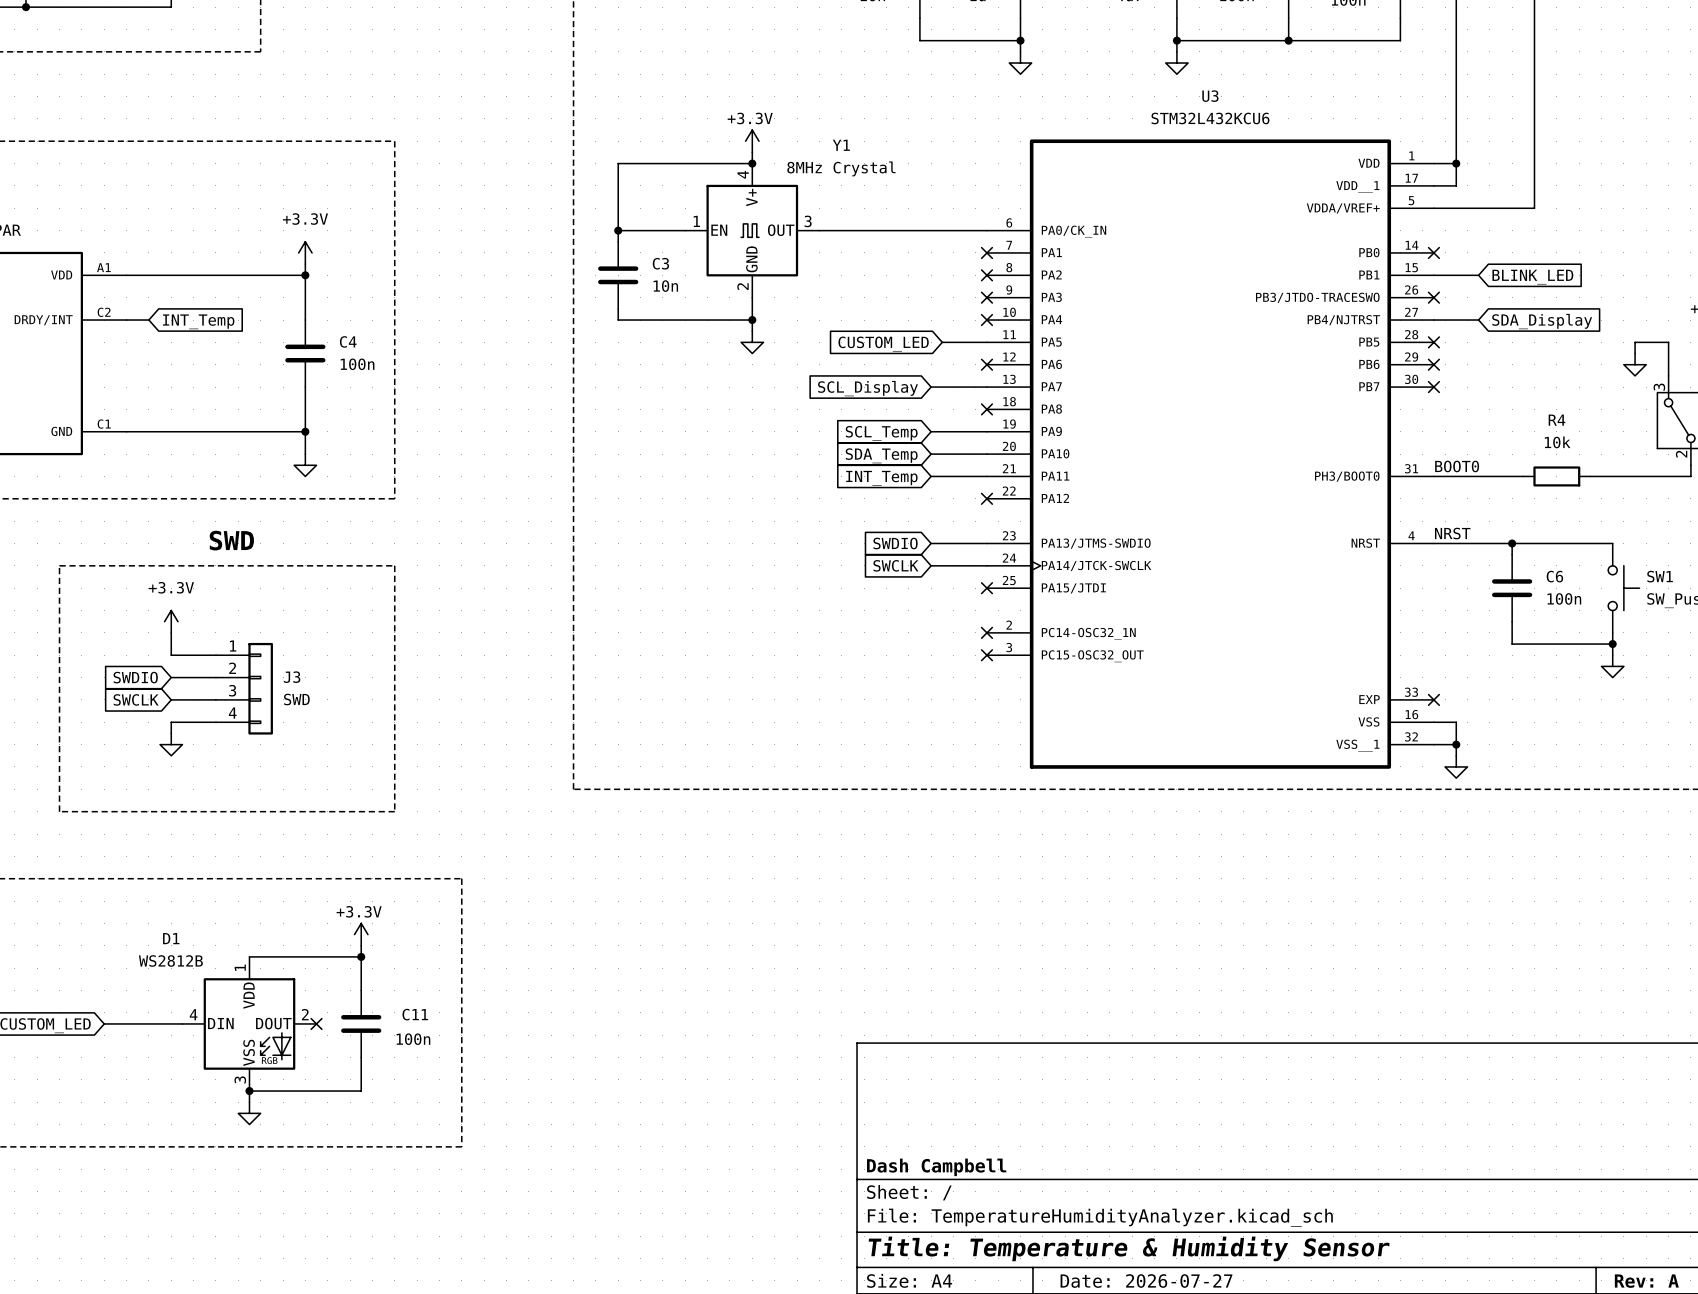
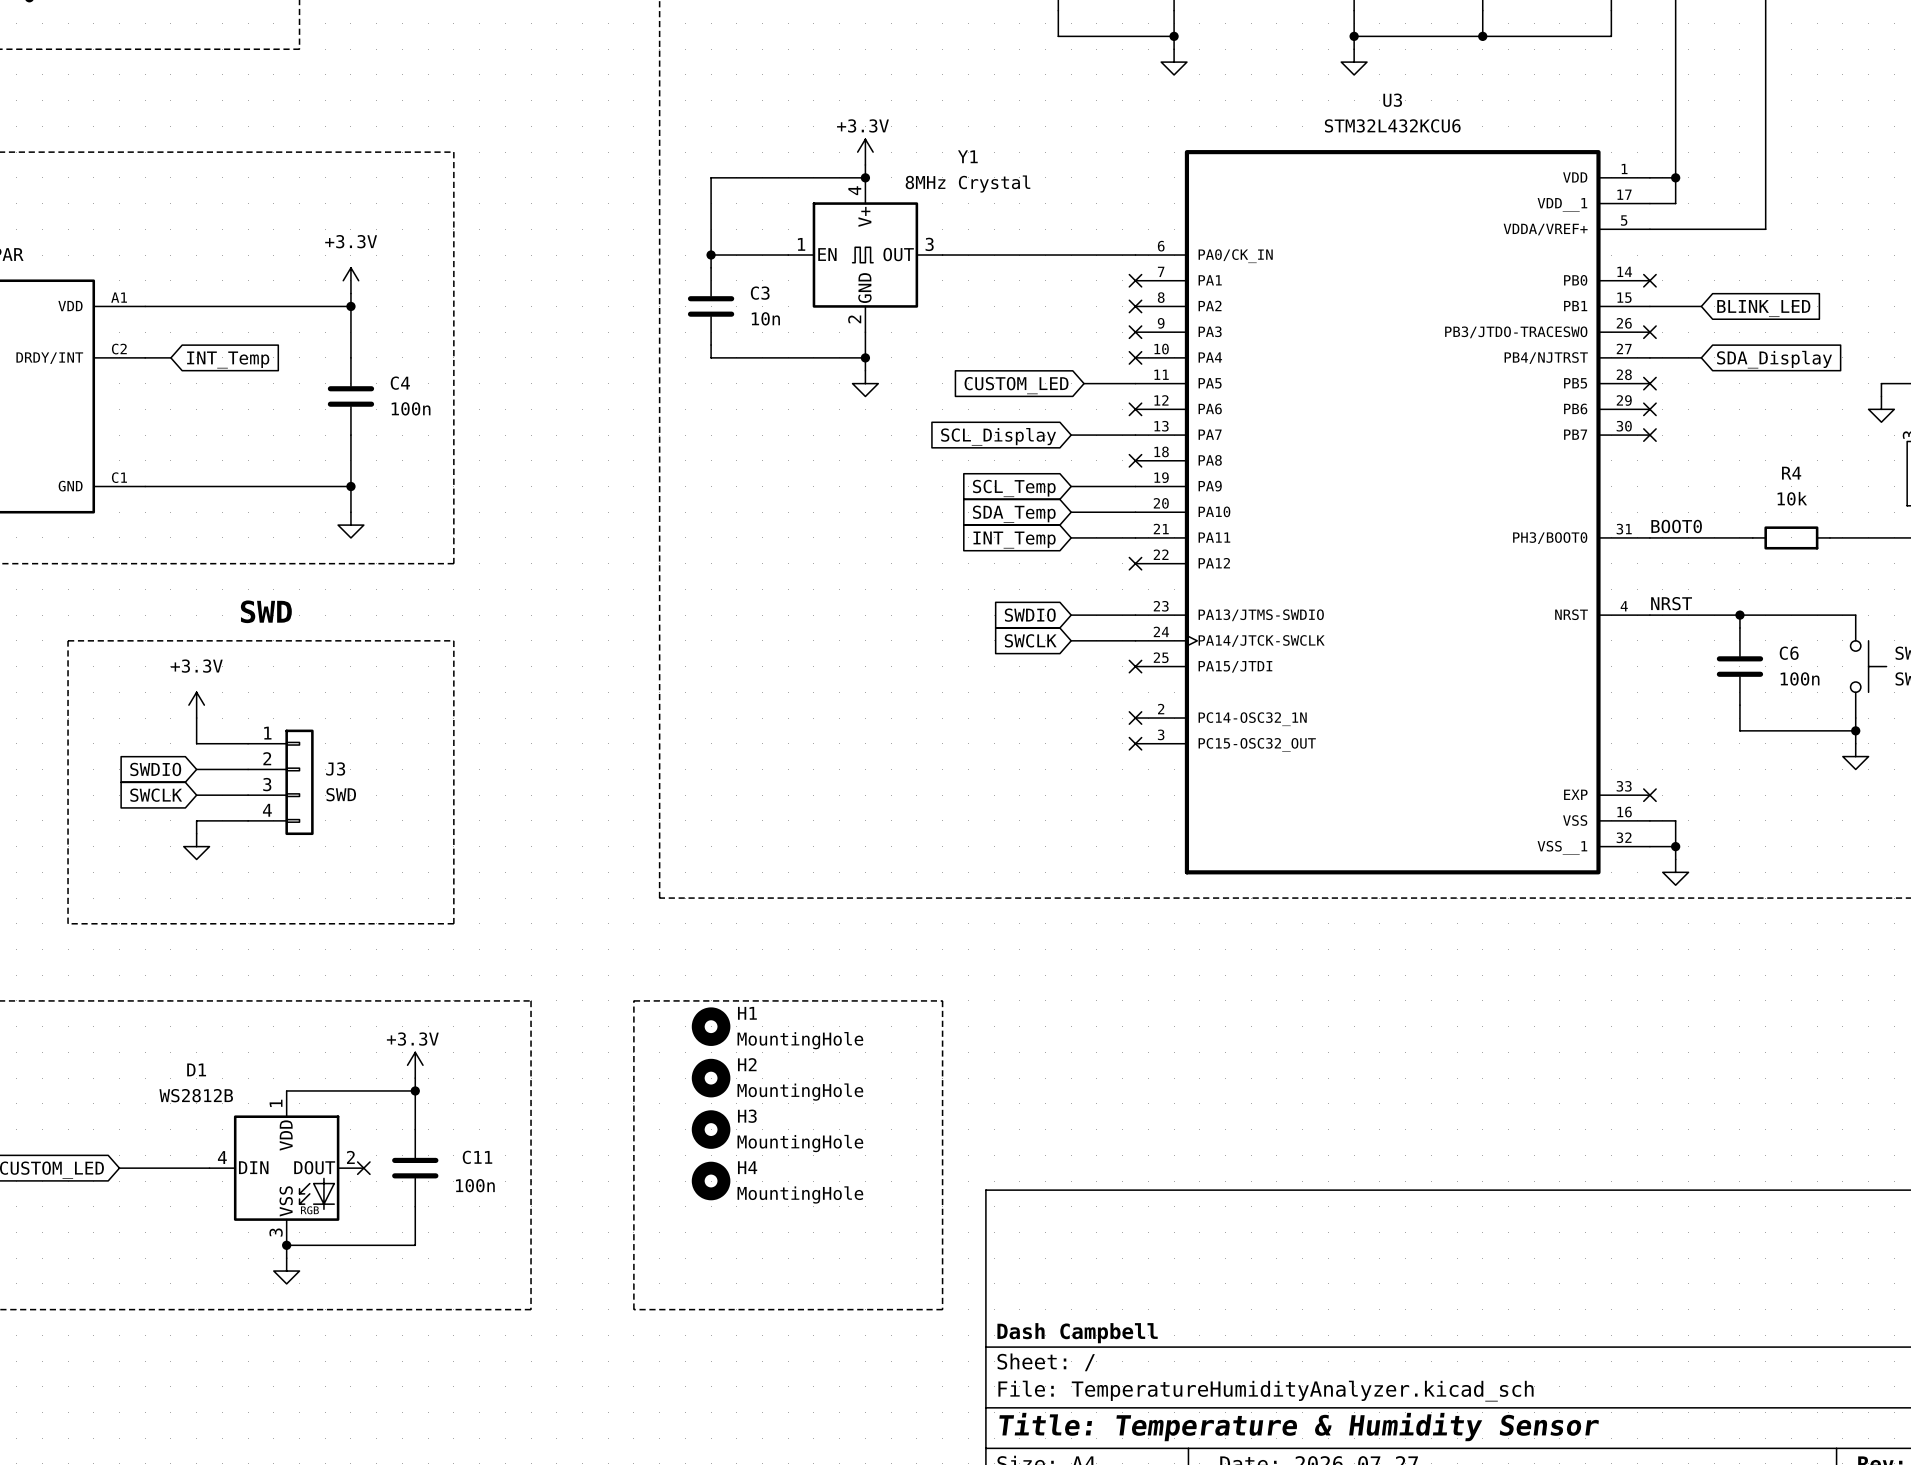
line: none -> (633, 1000) (942, 1000) (942, 1309) (633, 1309) (633, 1000)
H1: none -> MountingHole (711, 1026)
H2: none -> MountingHole (711, 1078)
H3: none -> MountingHole (711, 1129)
H4: none -> MountingHole (711, 1181)

